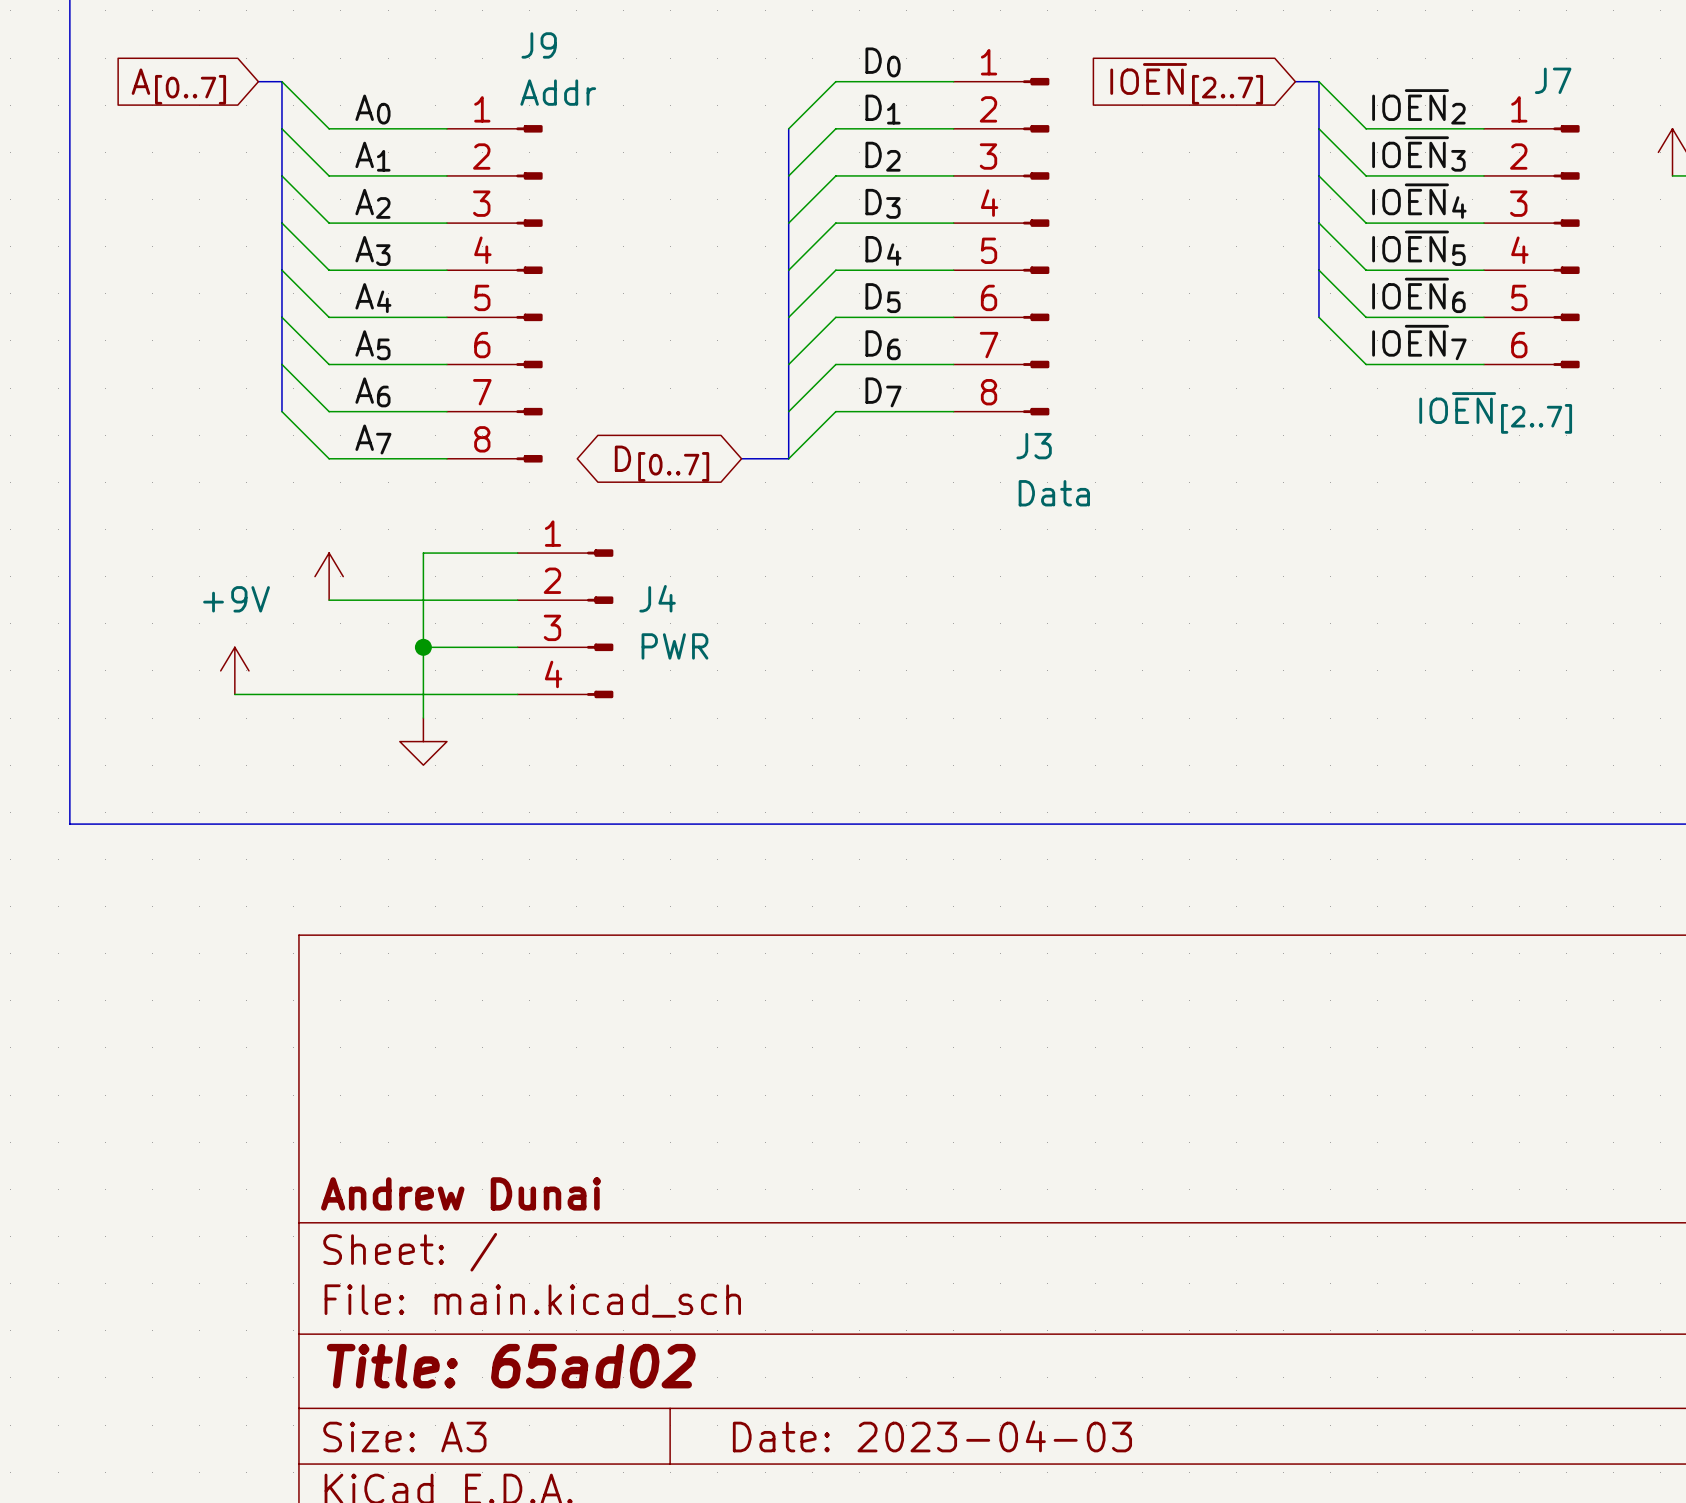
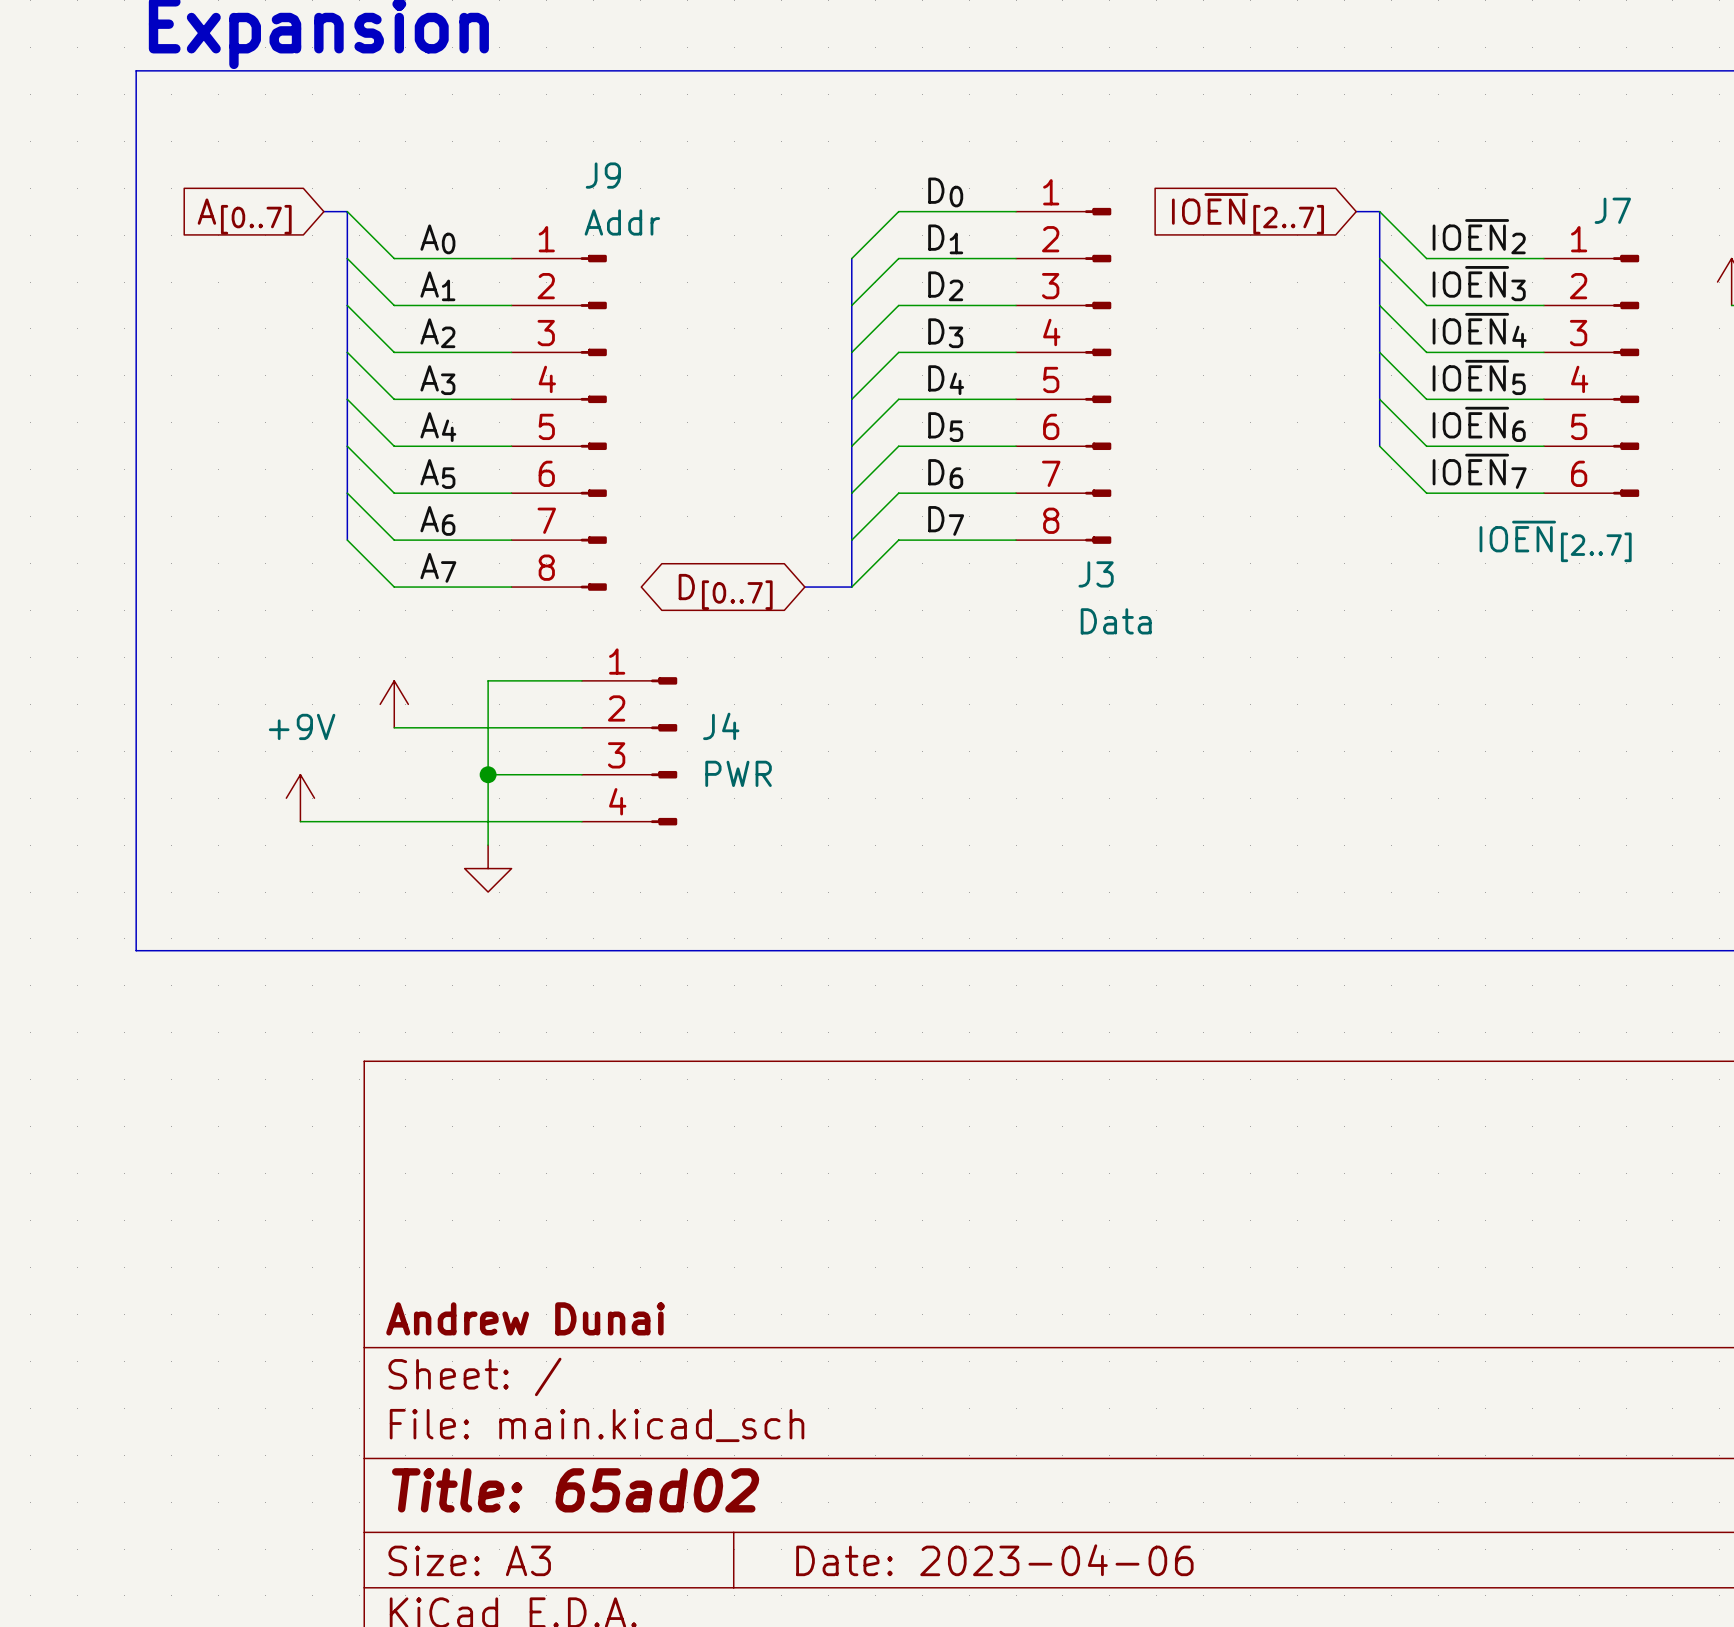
title block: Date: 2023-04-03 (932, 1436) -> Date: 2023-04-06 (994, 1560)

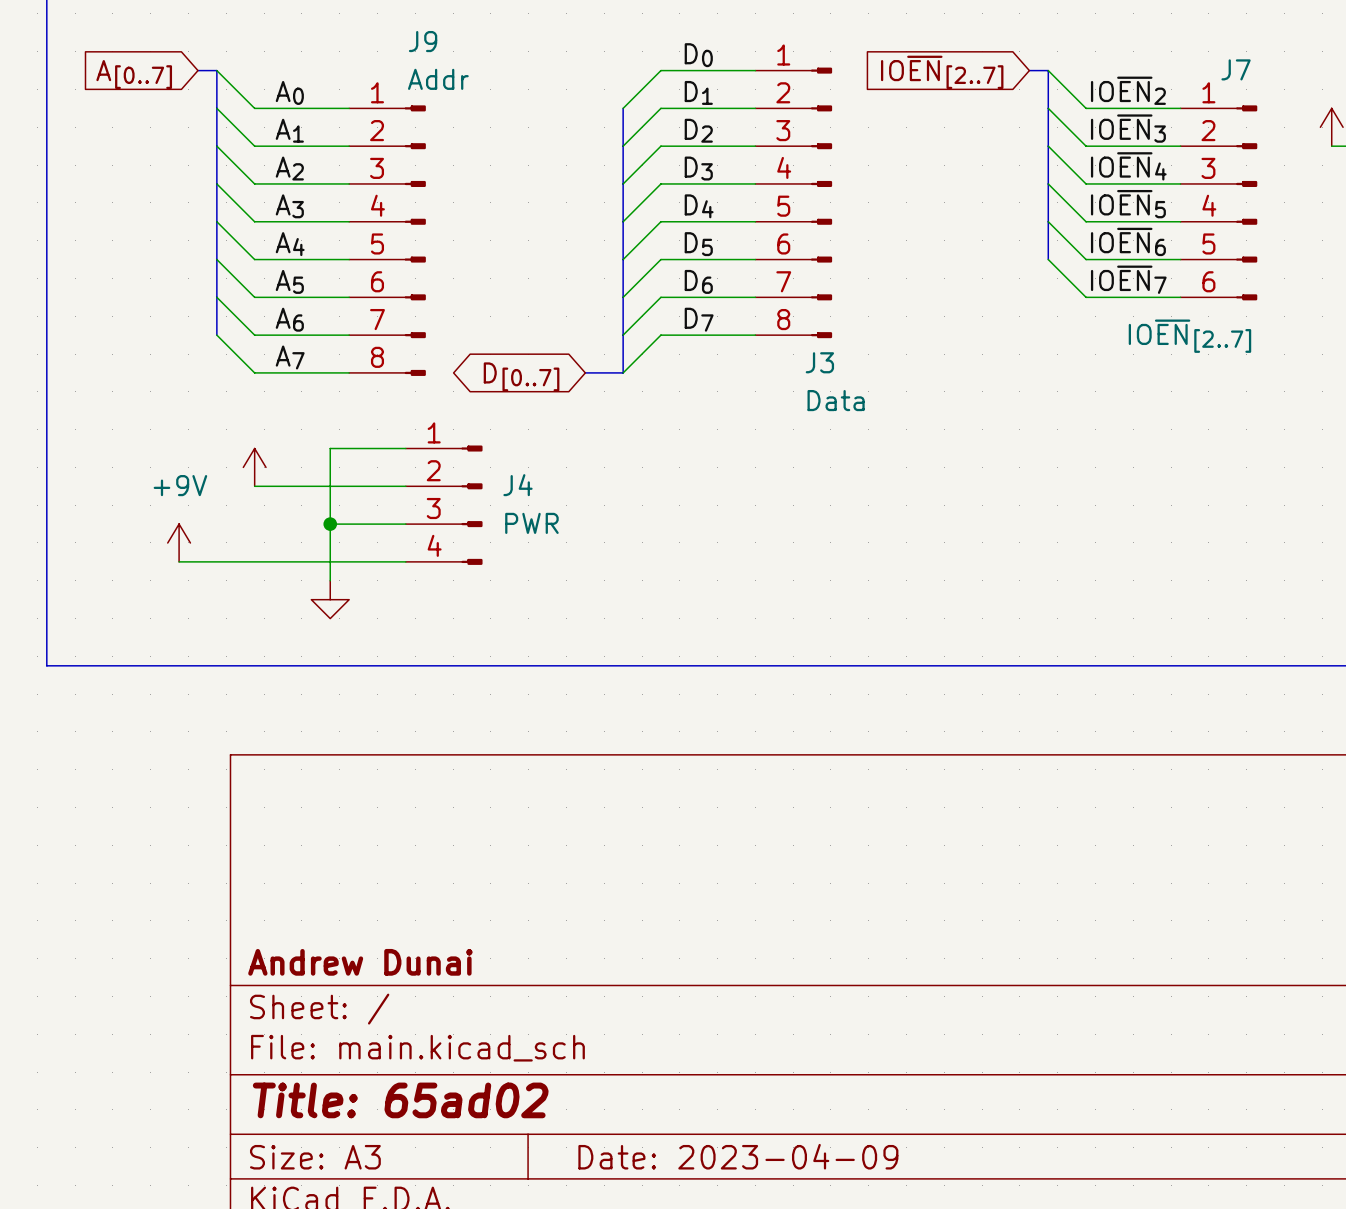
title block: Date: 2023-04-06 (994, 1560) -> Date: 2023-04-09 (738, 1156)

